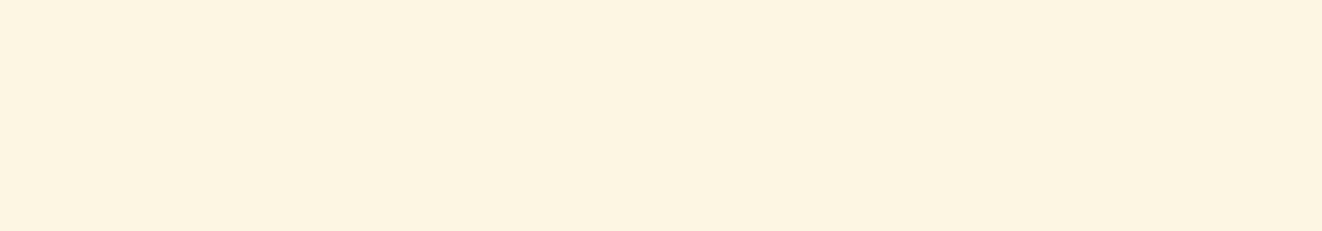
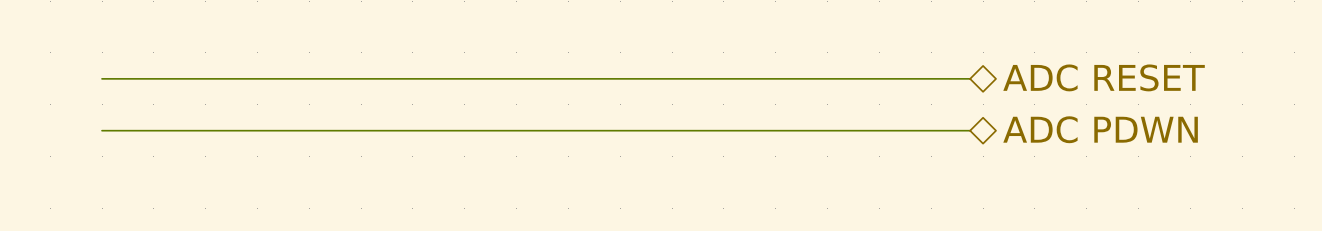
hierarchical label: none -> ADC RESET (1104, 77)
wire: none -> (102, 78) (970, 78)
hierarchical label: none -> ADC PDWN (1100, 129)
wire: none -> (102, 130) (970, 130)

